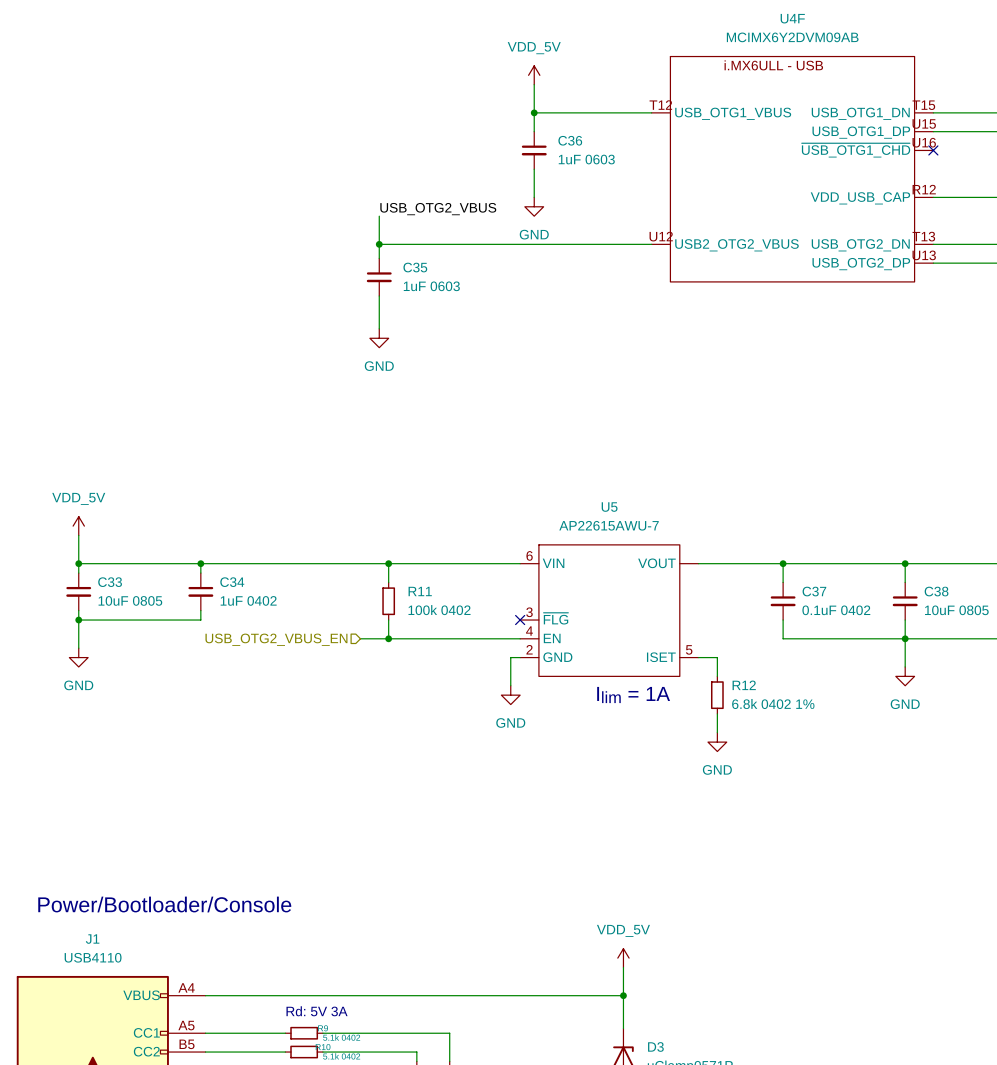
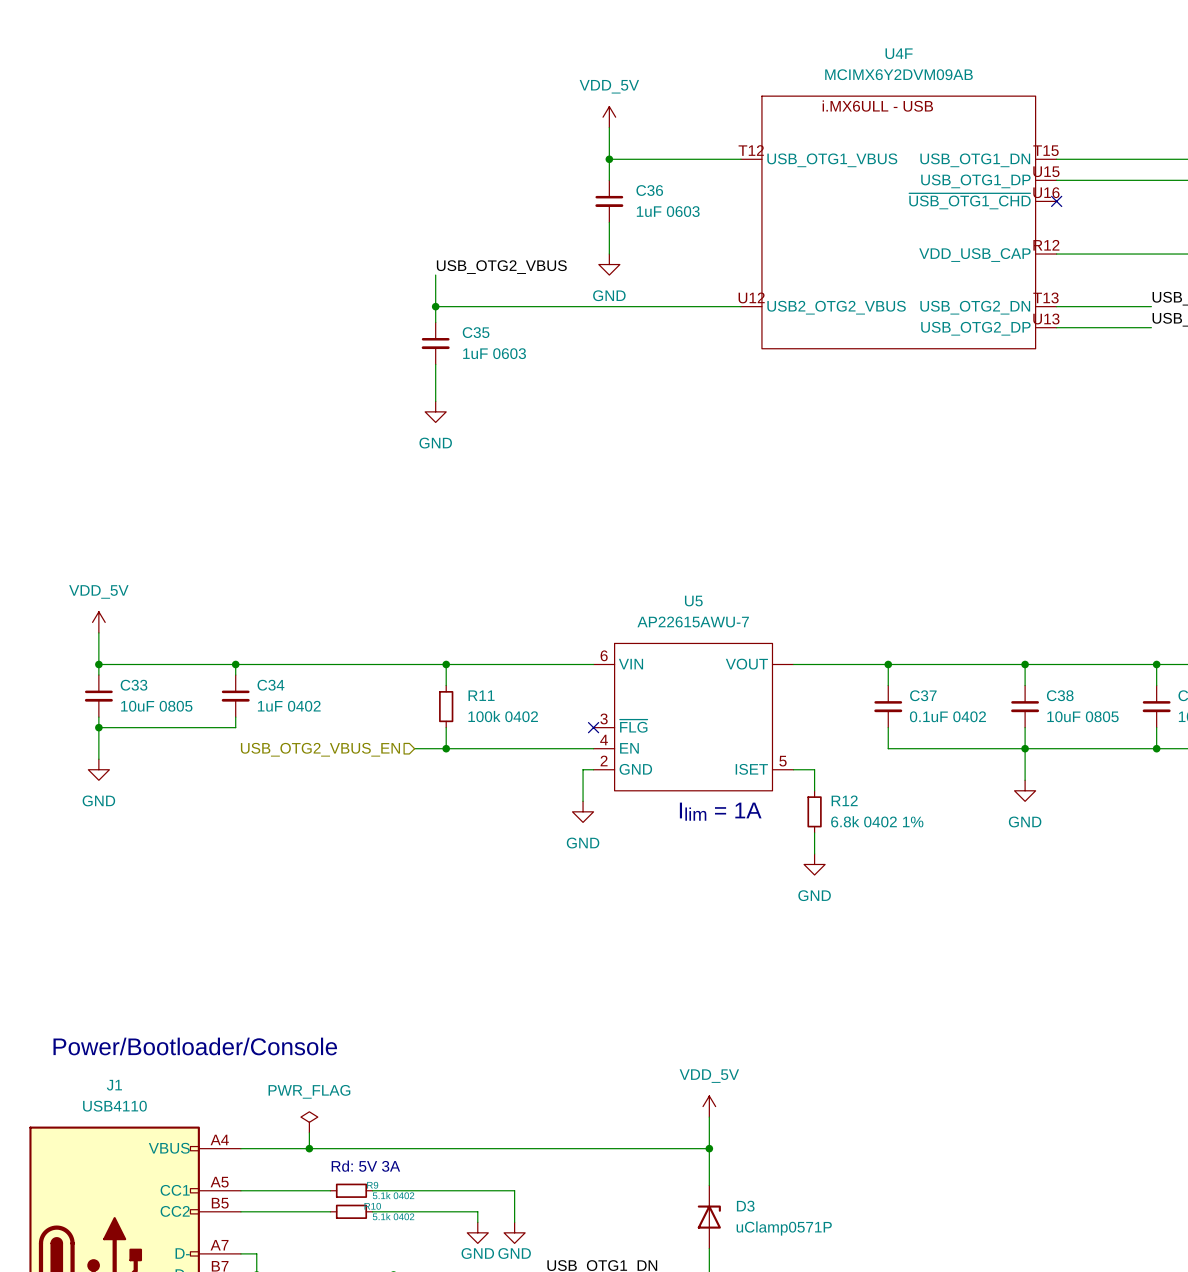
power symbol: none -> PWR_FLAG (309, 1122)
wire: none -> (309, 1132) (309, 1148)
junction: none -> (309, 1148)

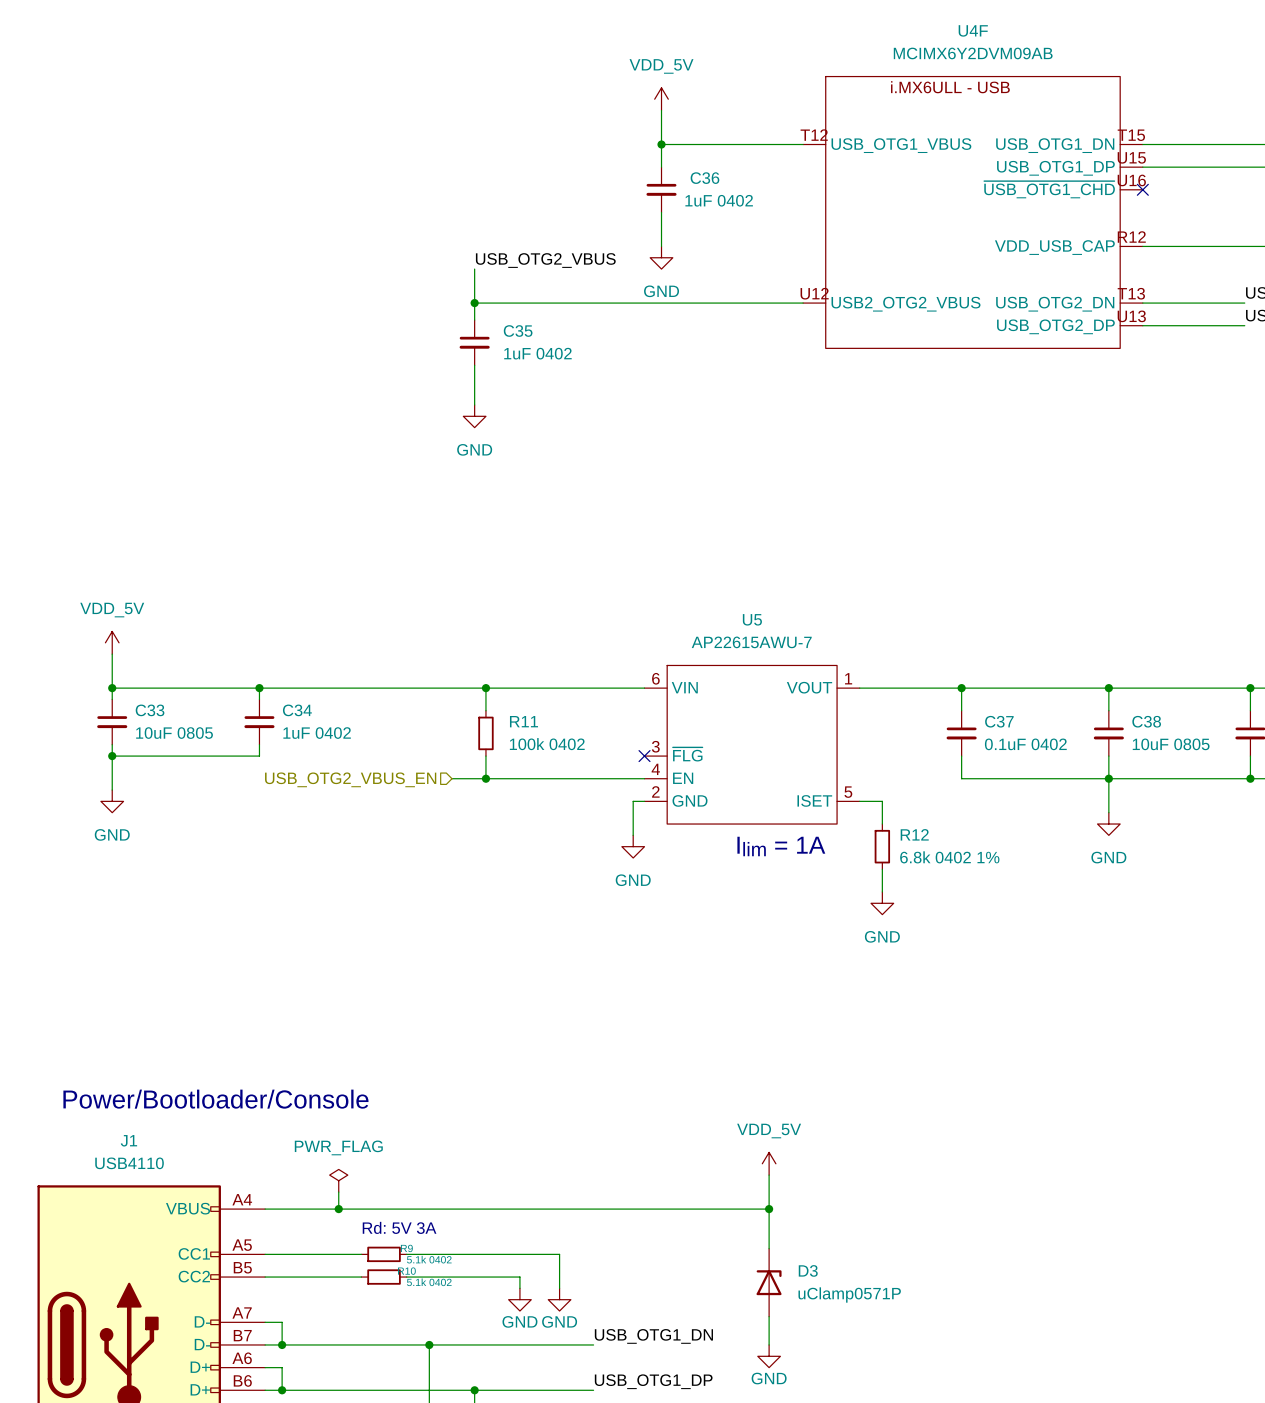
C36 value: 1uF 0603 (668, 211) -> 1uF 0402 (719, 200)
C35 value: 1uF 0603 (494, 353) -> 1uF 0402 (537, 353)
U5 pin number: none -> 1 (848, 678)

